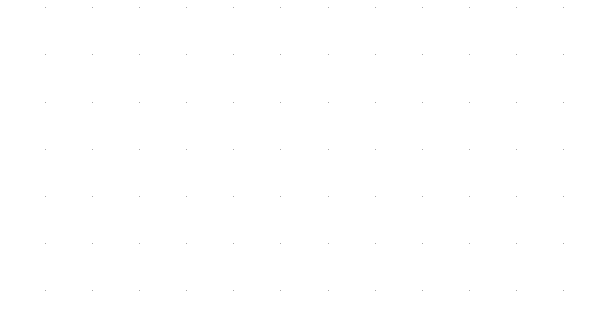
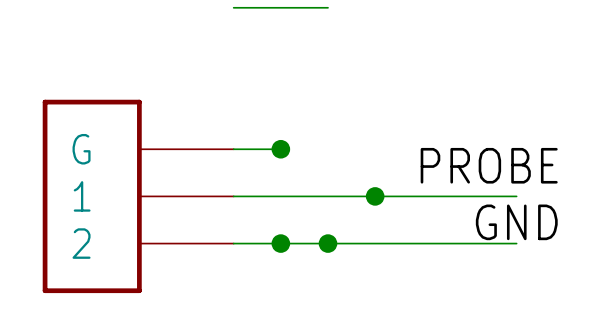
wire: none -> (233, 7) (328, 7)
wire: none -> (233, 149) (280, 149)
junction: none -> (280, 149)
label: none -> PROBE (489, 165)
part: none -> (138, 196)
wire: none -> (233, 196) (516, 196)
junction: none -> (375, 196)
label: none -> GND (516, 222)
wire: none -> (233, 243) (516, 243)
junction: none -> (280, 243)
junction: none -> (328, 243)

